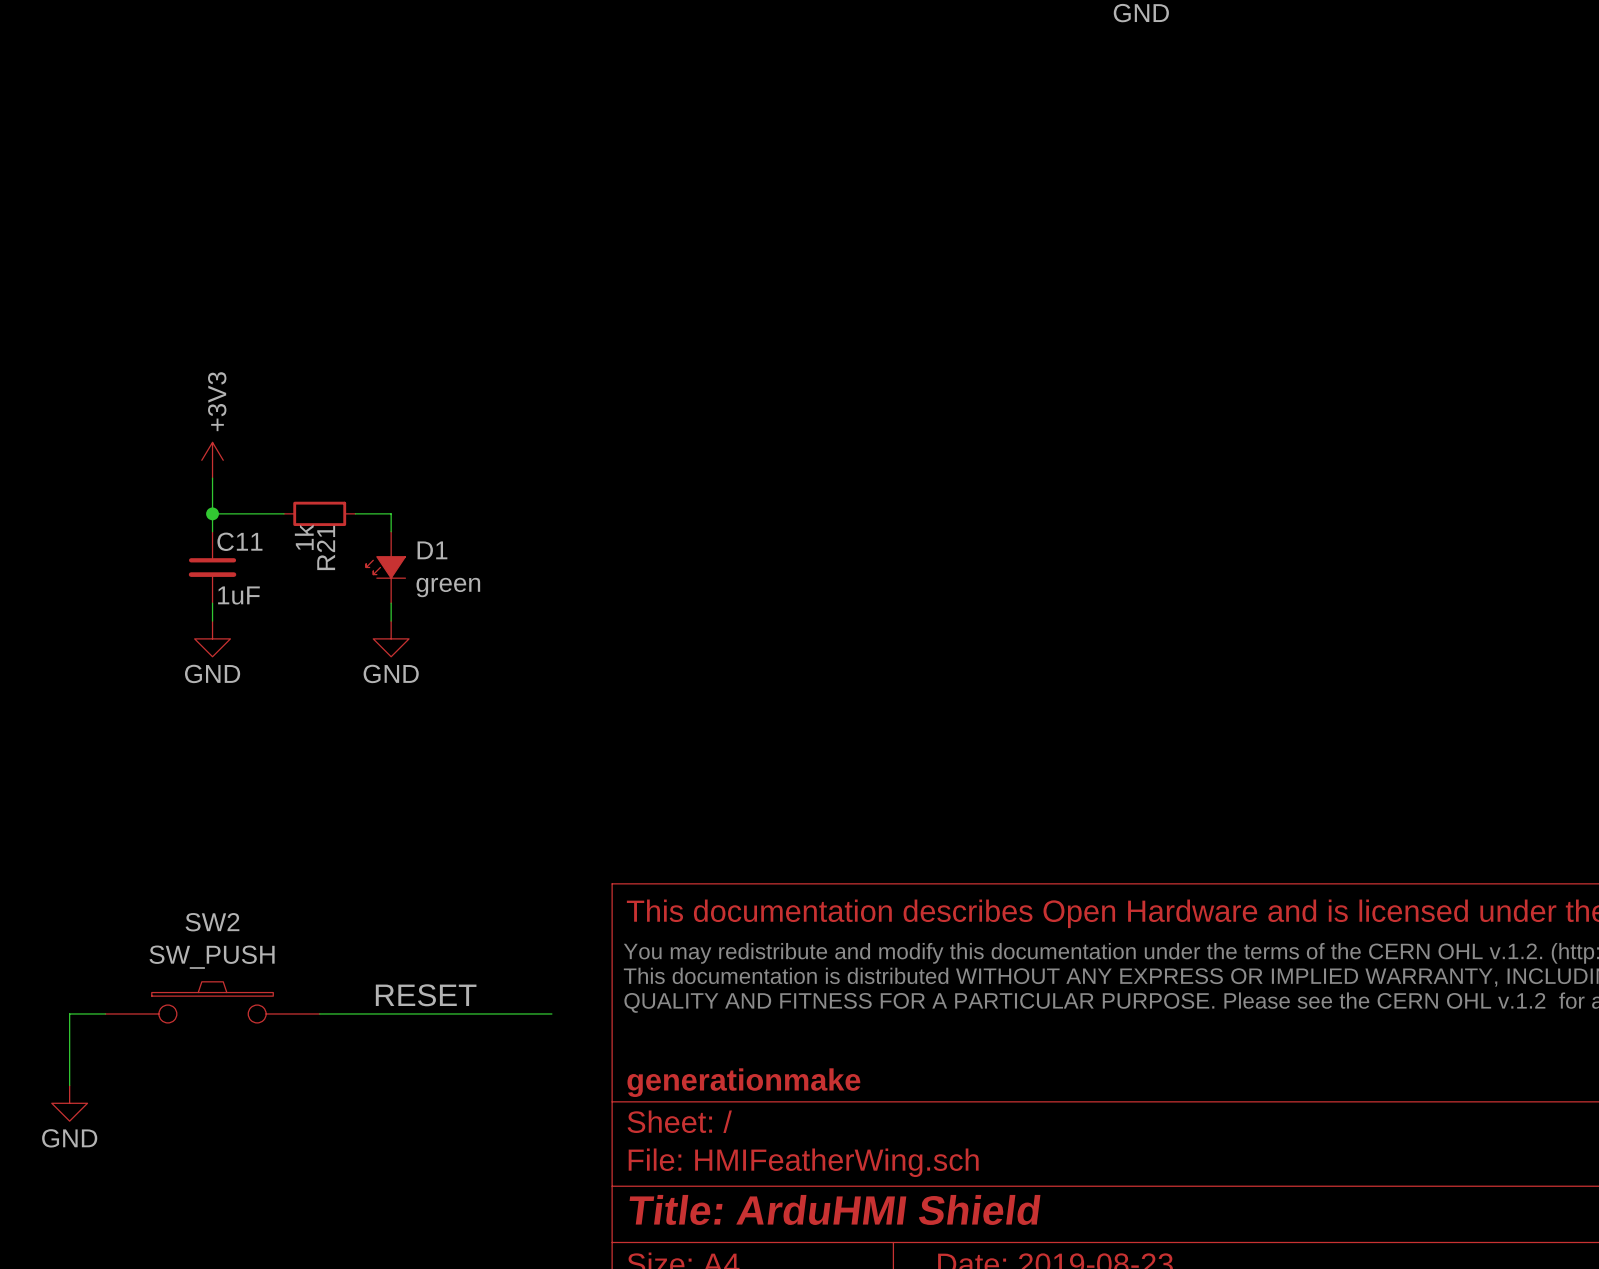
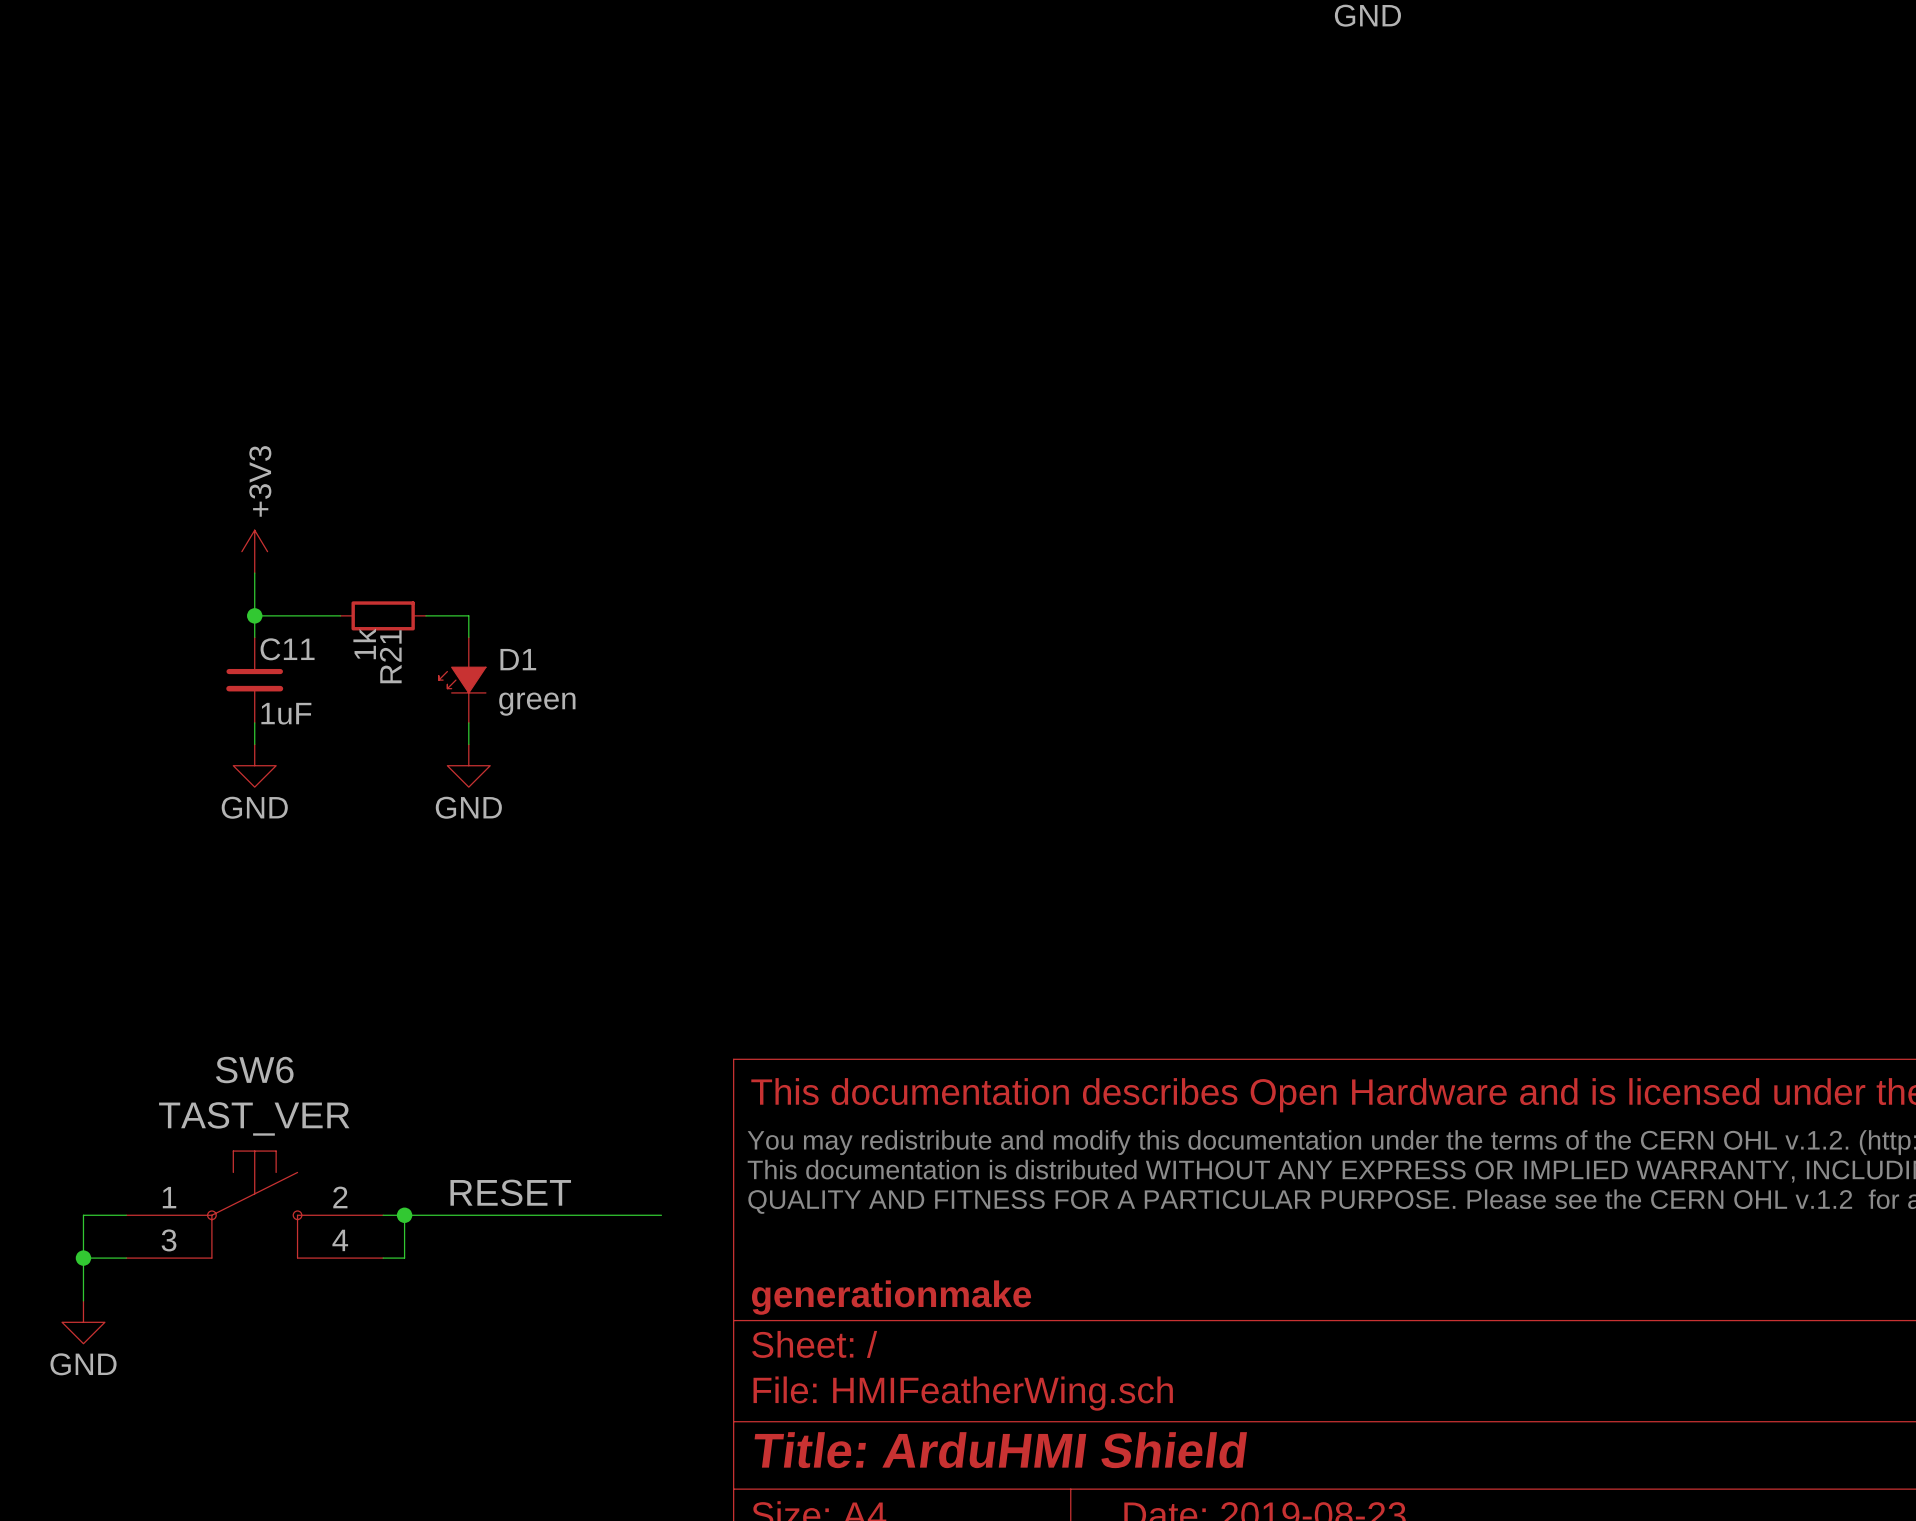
SW2: SW_PUSH (212, 1002) -> none
SW6: none -> TAST_VER (254, 1204)
wire: none -> (404, 1215) (404, 1258) (383, 1258)
junction: none -> (404, 1215)
wire: none -> (83, 1258) (126, 1258)
junction: none -> (83, 1258)

